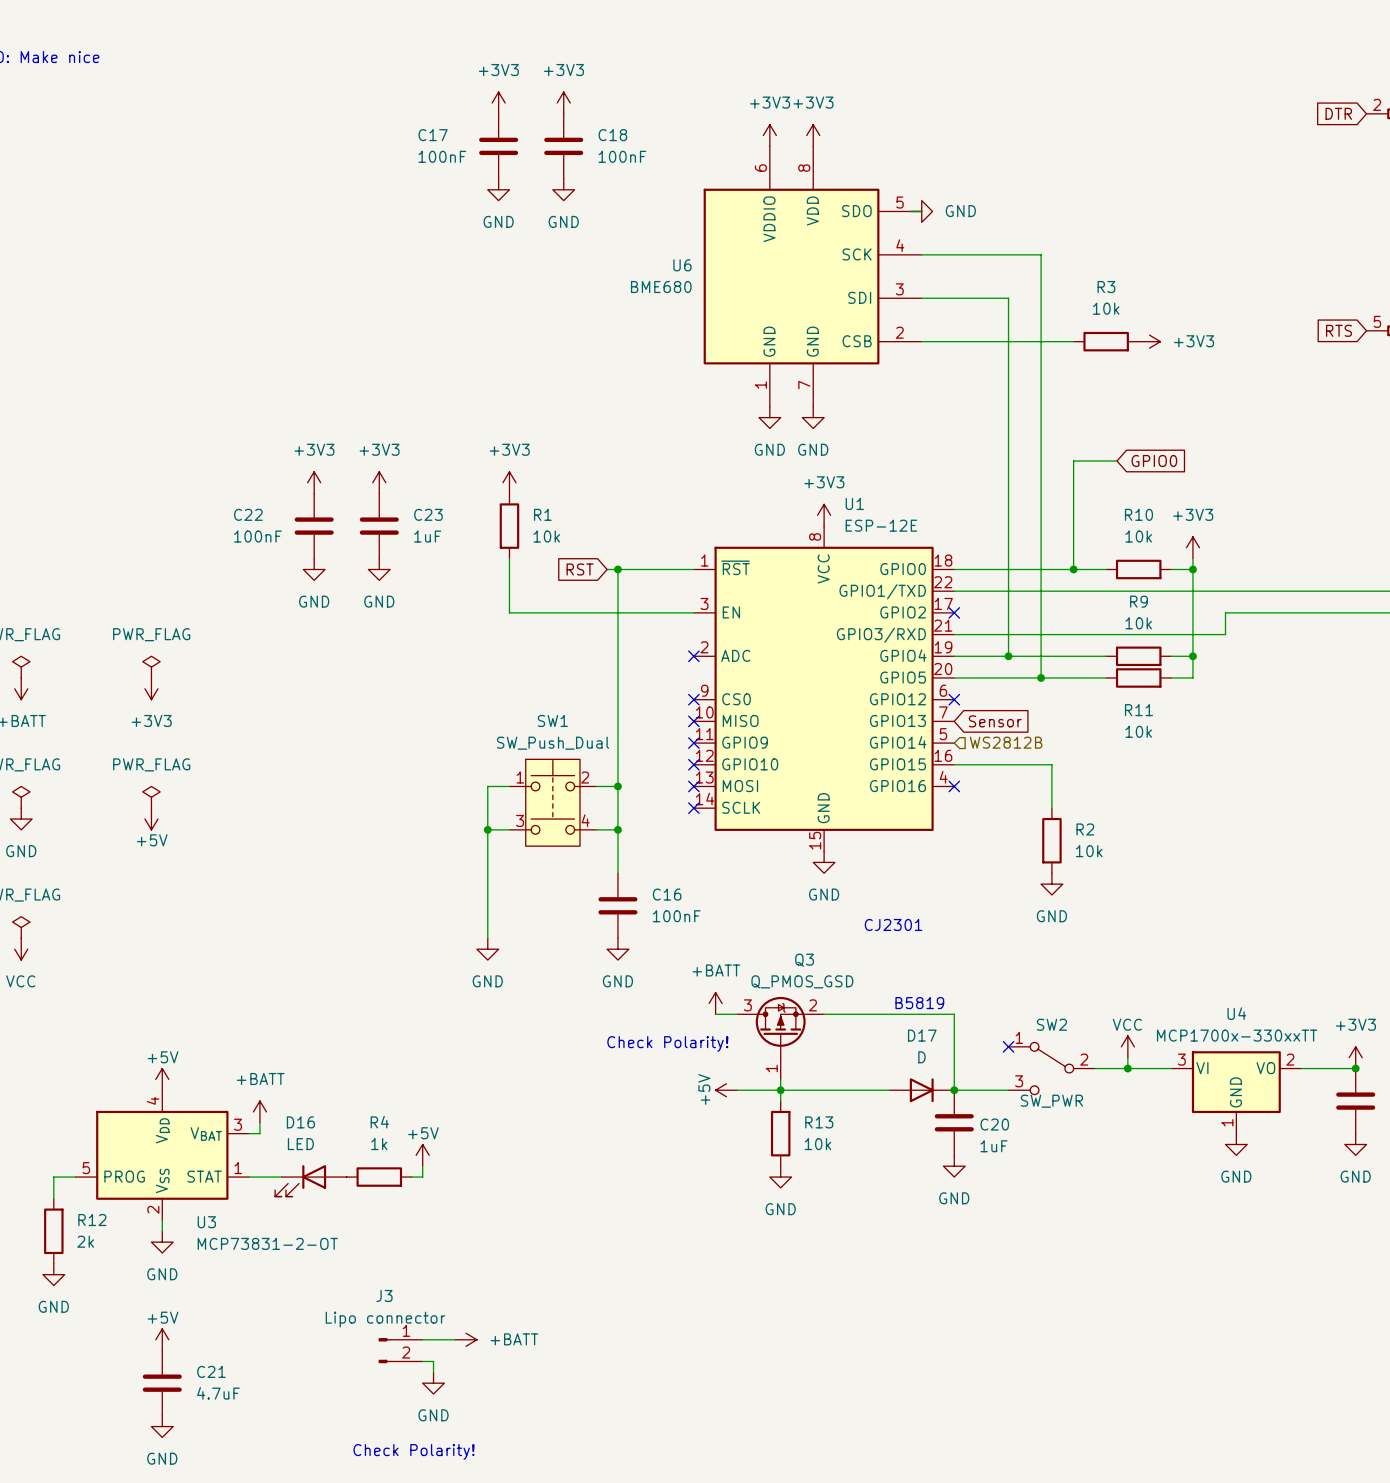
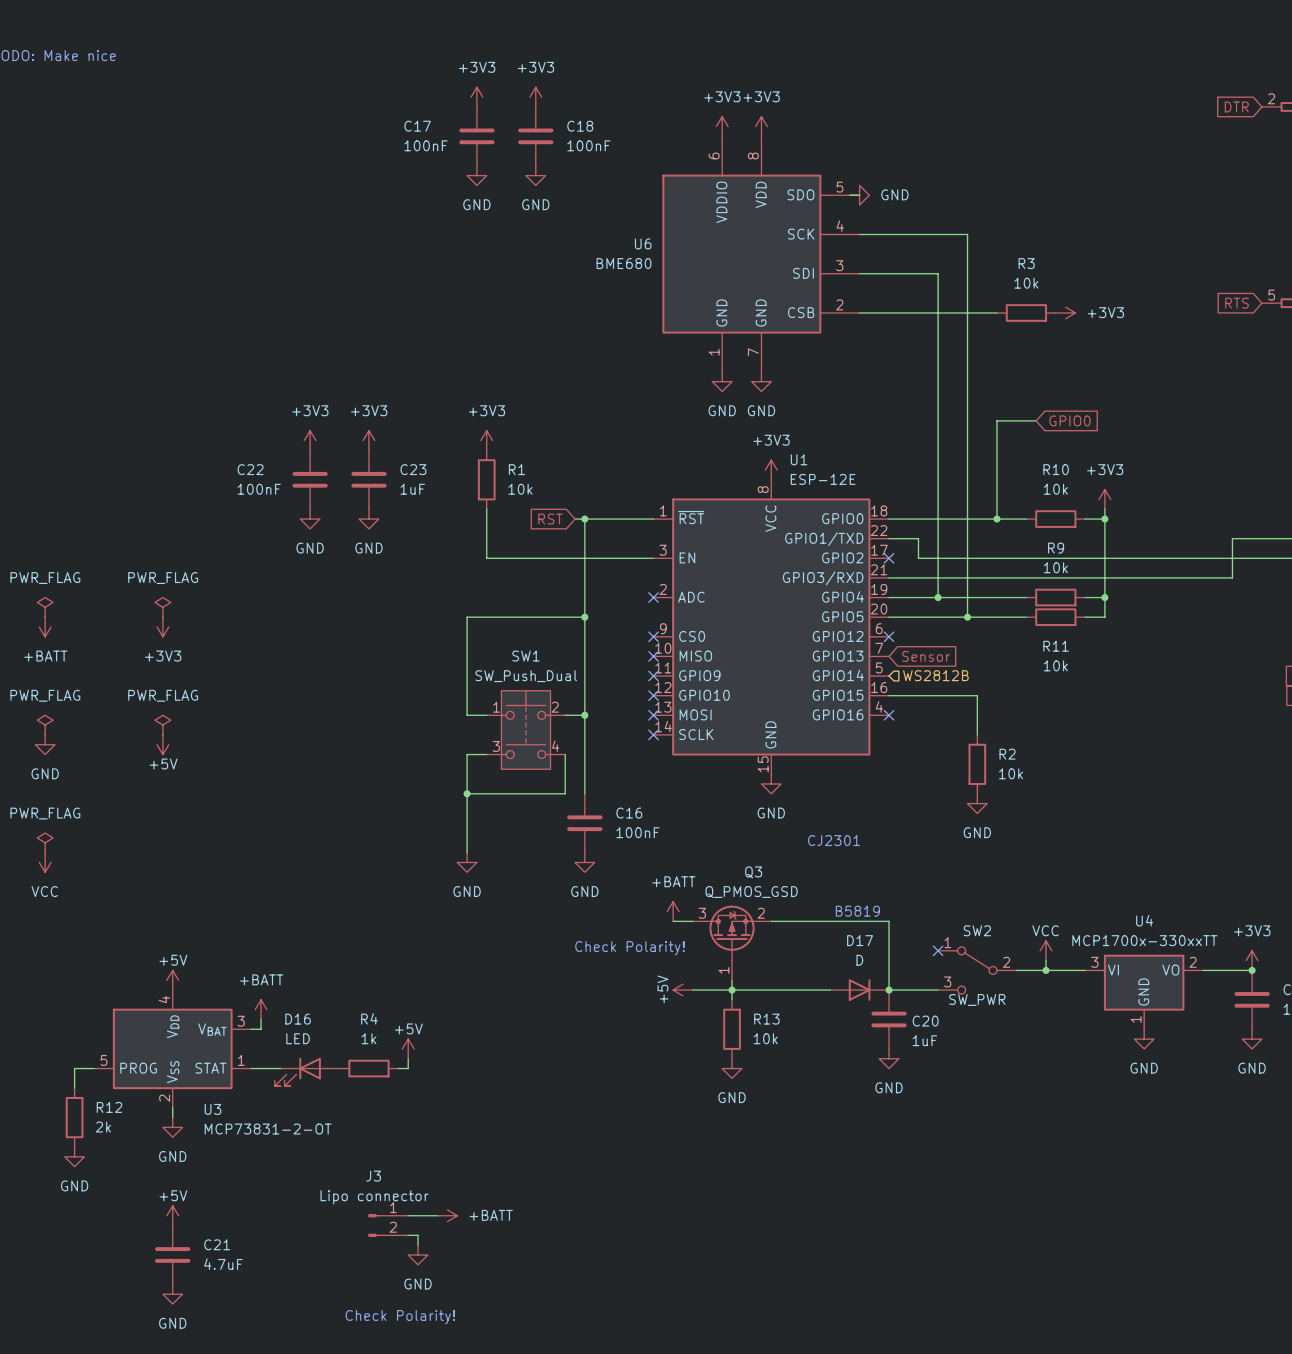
wire: (986, 591) (1334, 591) -> (918, 538) (918, 558) (1134, 558)
wire: (1225, 612) (1225, 634) -> (1232, 538) (1232, 577) (1134, 577)
junction: none -> (584, 617)
wire: (487, 786) (487, 829) -> (467, 715) (467, 617) (584, 617)
junction position: (487, 829) -> (467, 793)
wire: (596, 829) (617, 829) -> (565, 754) (565, 793) (467, 793)
junction: (617, 829) -> none

